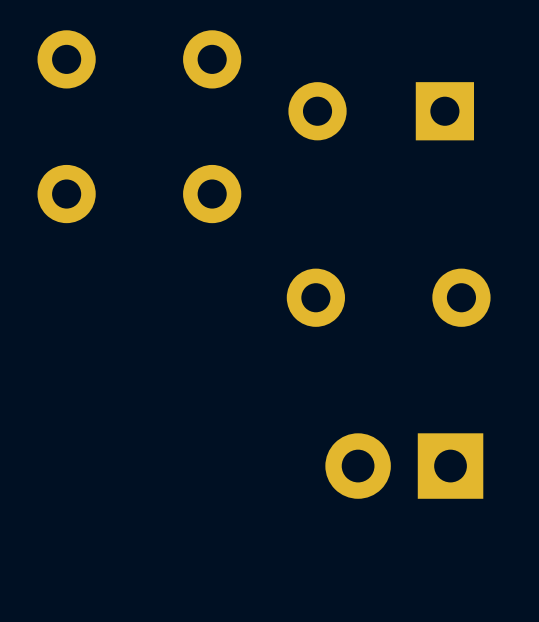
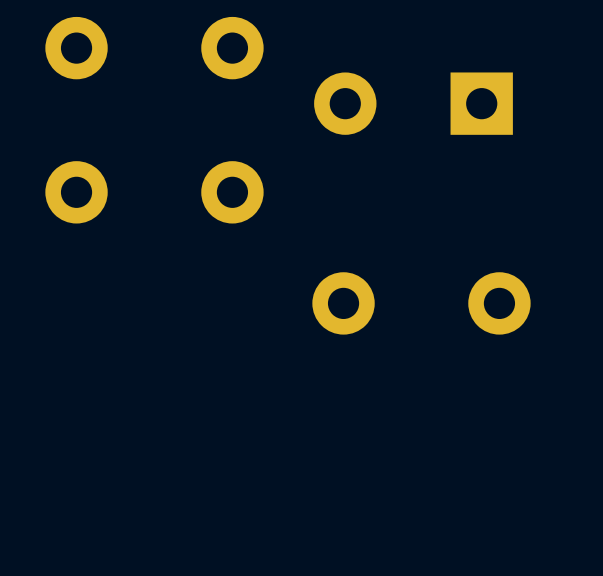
part: (404, 466) -> none

